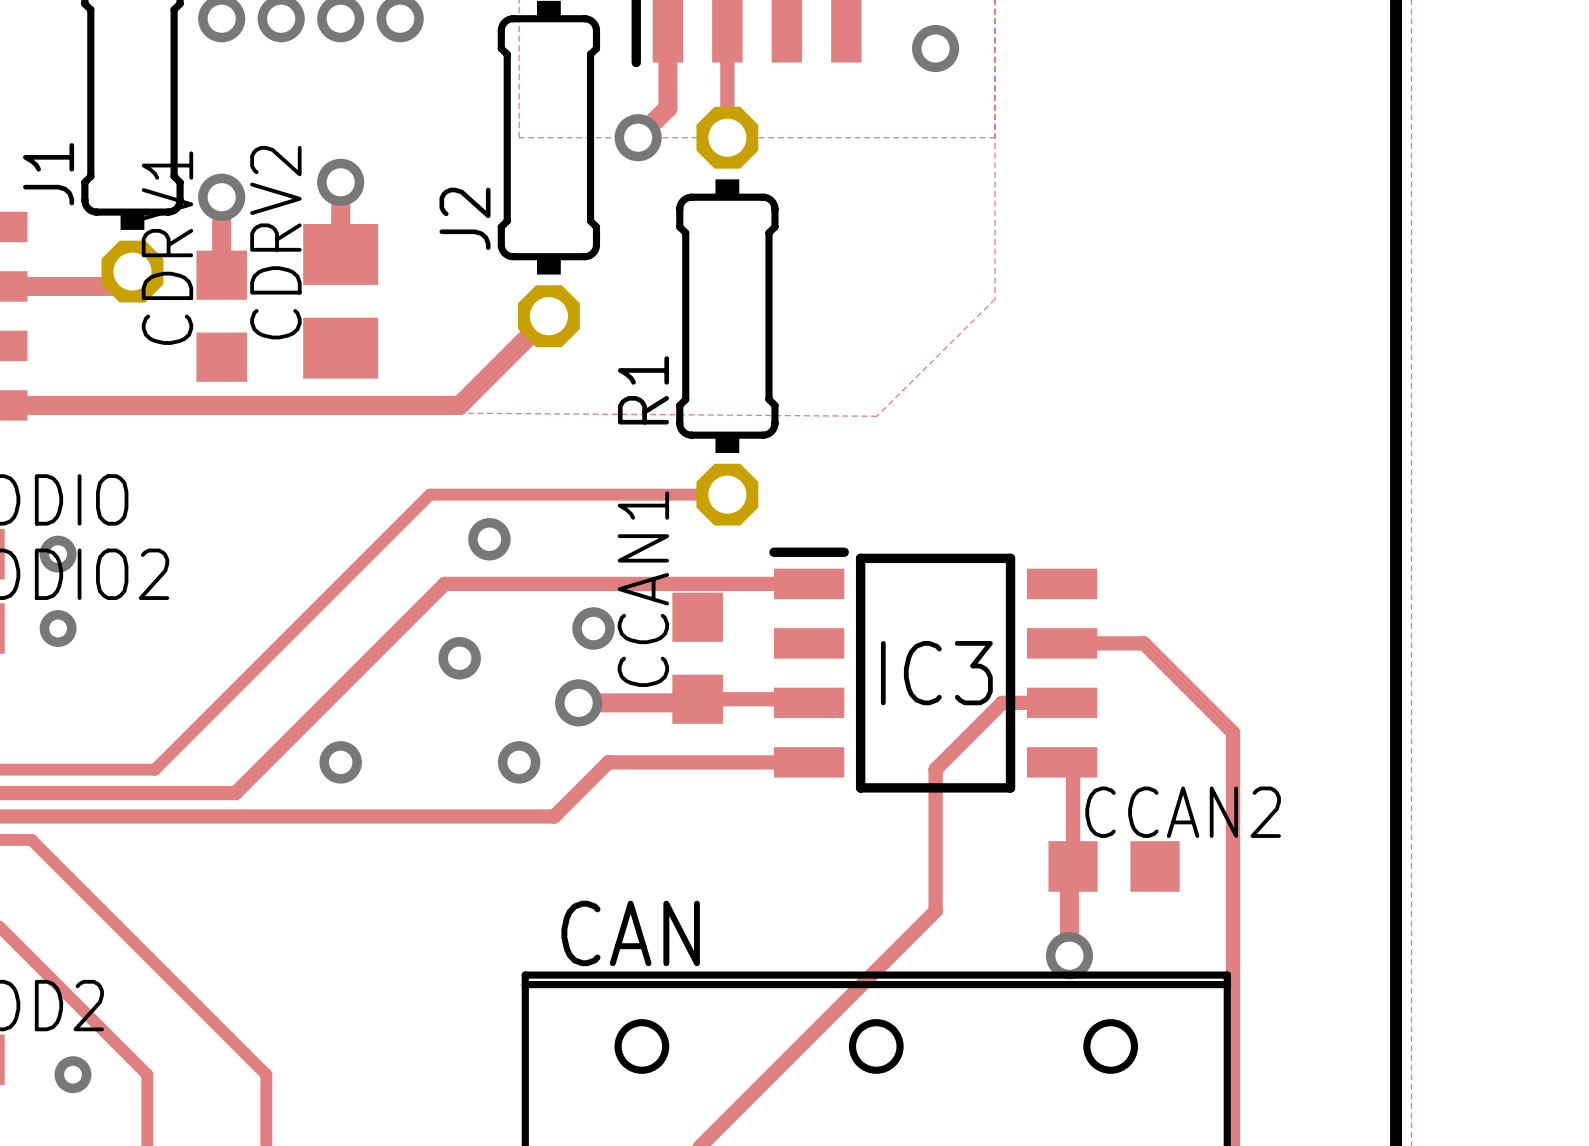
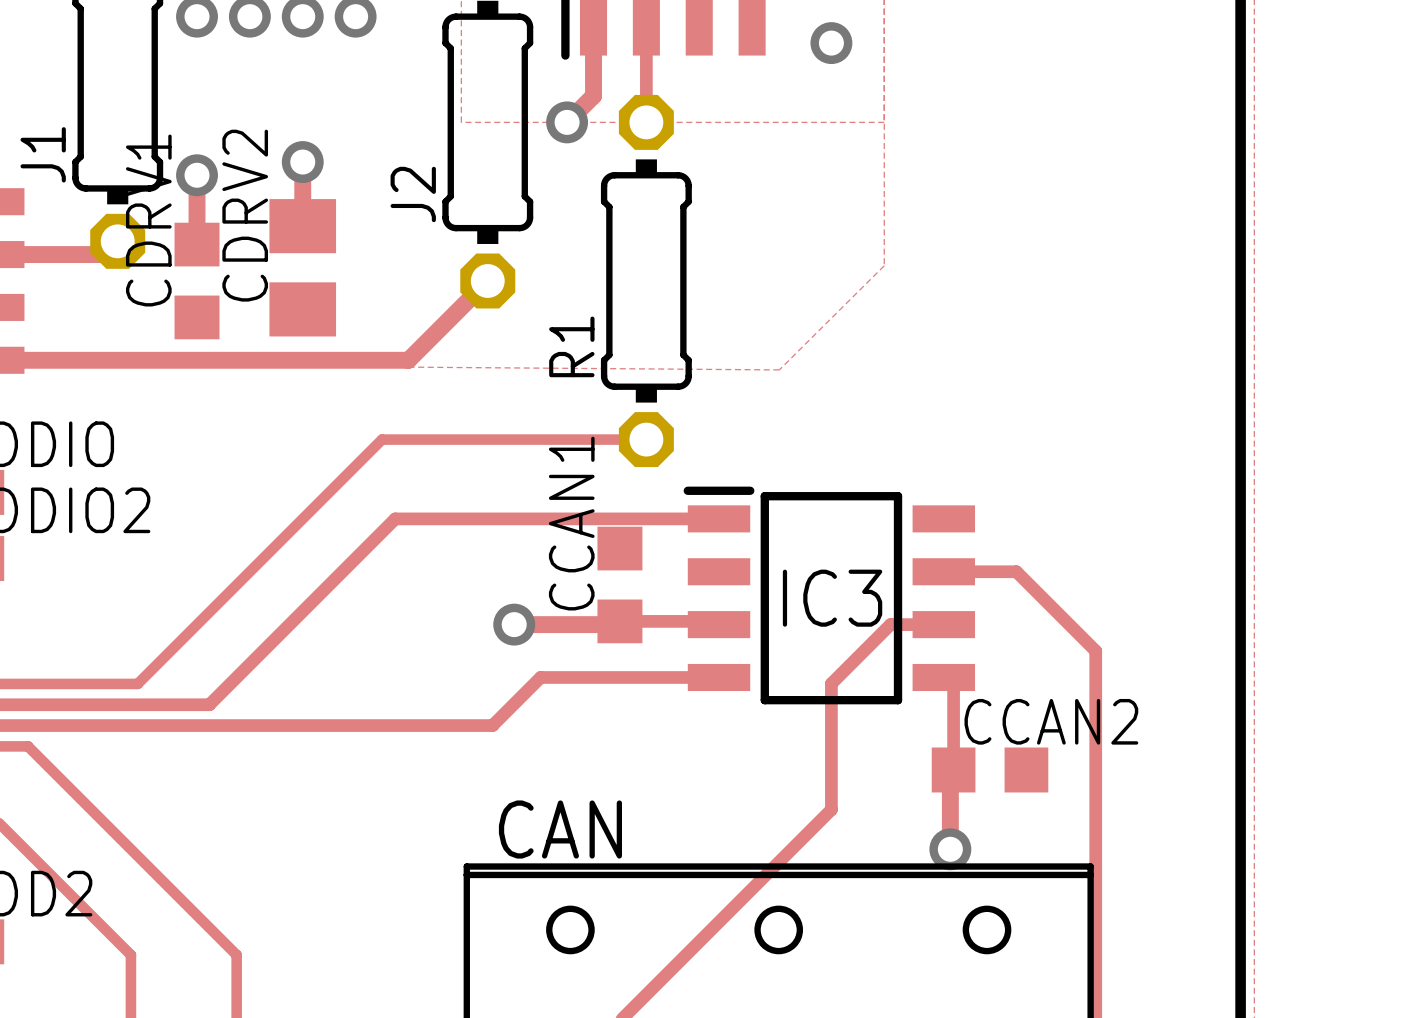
via: (489, 539) -> none
via: (58, 554) -> none
via: (58, 628) -> none
via: (593, 628) -> none
via: (459, 658) -> none
via: (340, 762) -> none
via: (519, 762) -> none
via: (72, 1074) -> none

